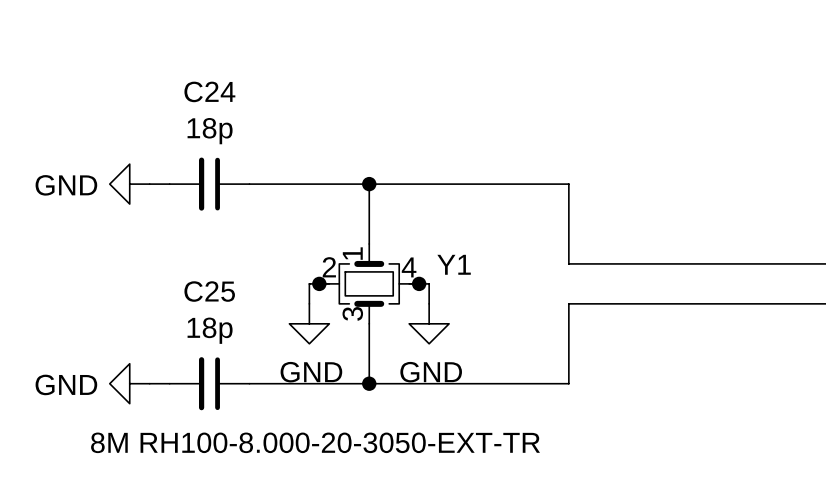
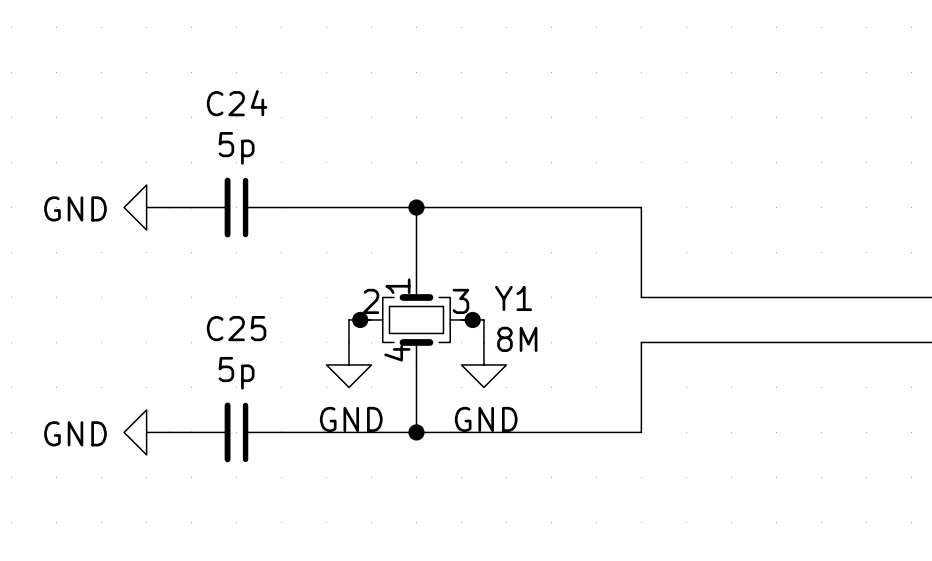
C24 value: 18p (210, 131) -> 5p (236, 148)
Y1 pin number: 4 (409, 267) -> 3 (460, 301)
Y1 pin number: 3 (352, 313) -> 4 (397, 353)
C25 value: 18p (210, 330) -> 5p (236, 373)
Y1 value: 8M RH100-8.000-20-3050-EXT-TR (315, 442) -> 8M (517, 339)

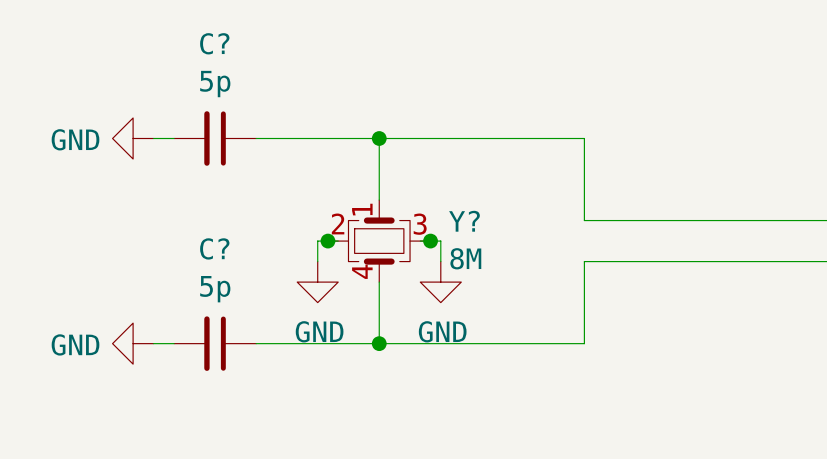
C24 name: C24 (237, 103) -> C? (214, 43)
Y1 name: Y1 (513, 298) -> Y? (464, 221)
C25 name: C25 (236, 328) -> C? (214, 248)

